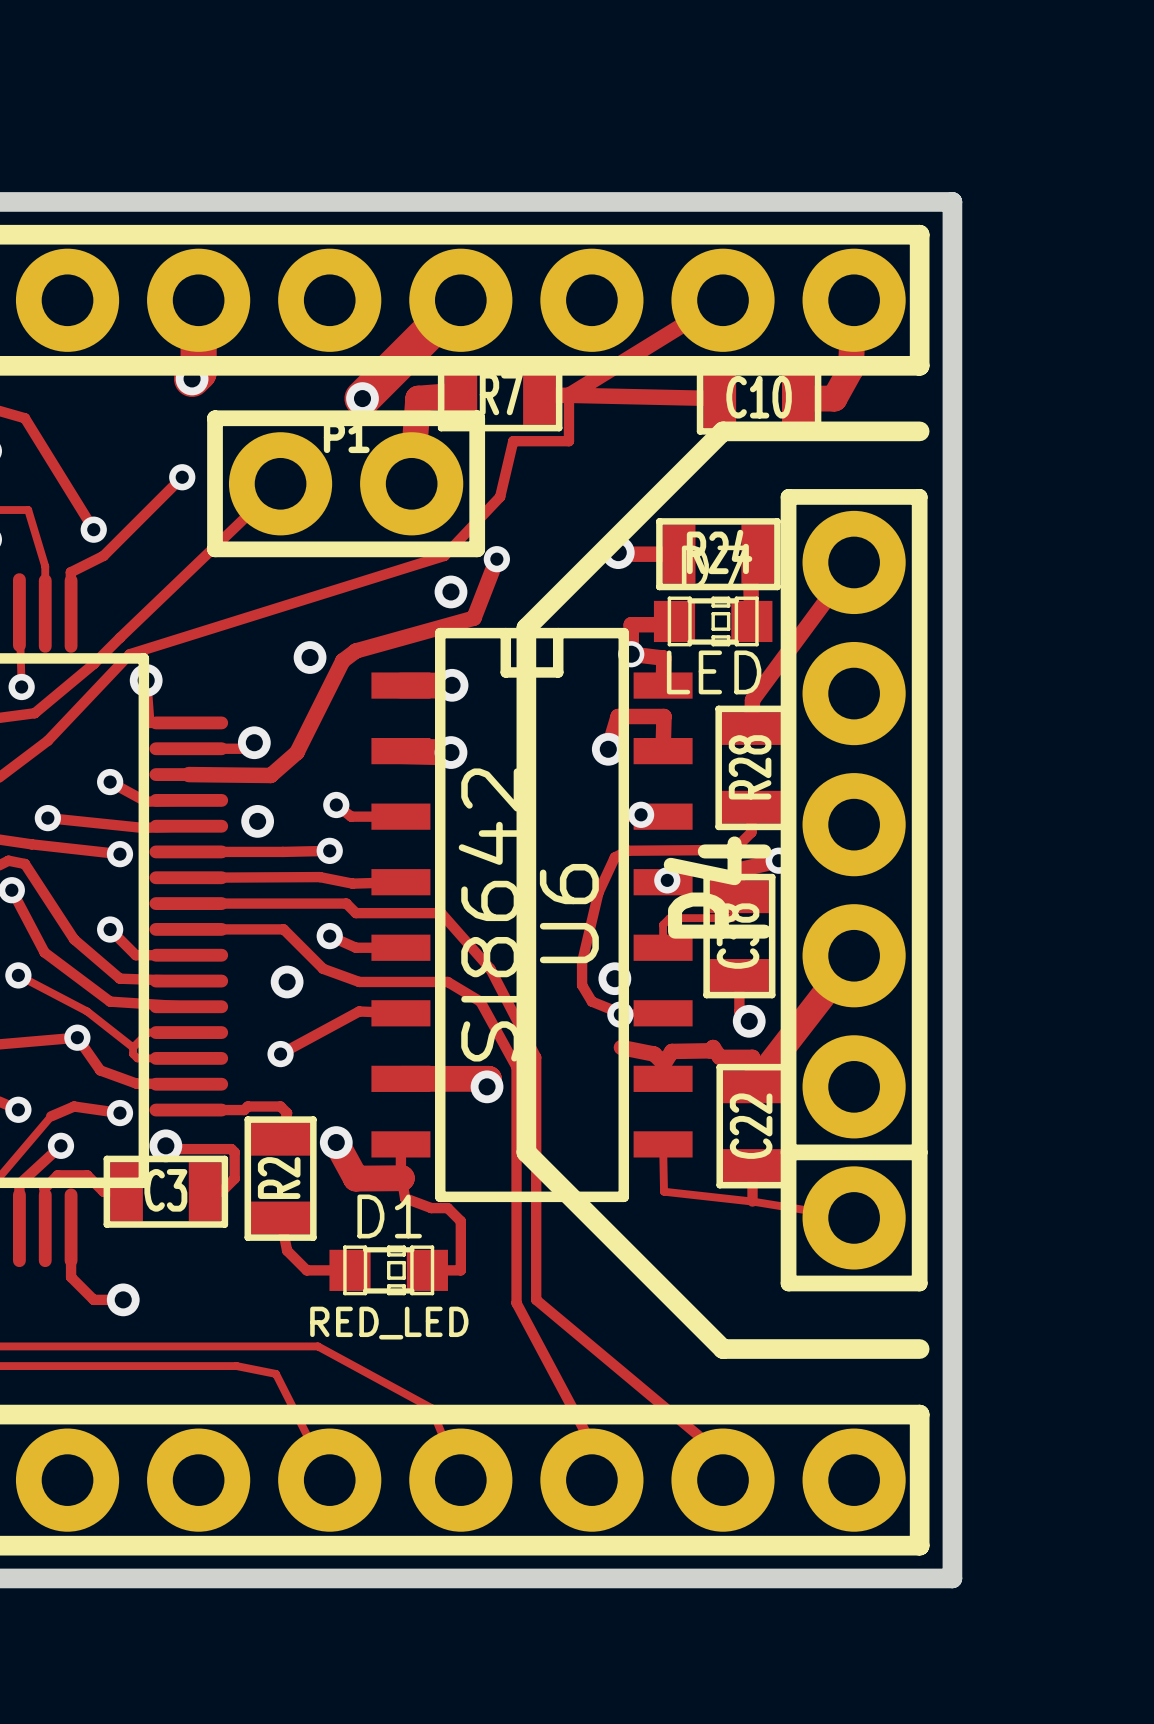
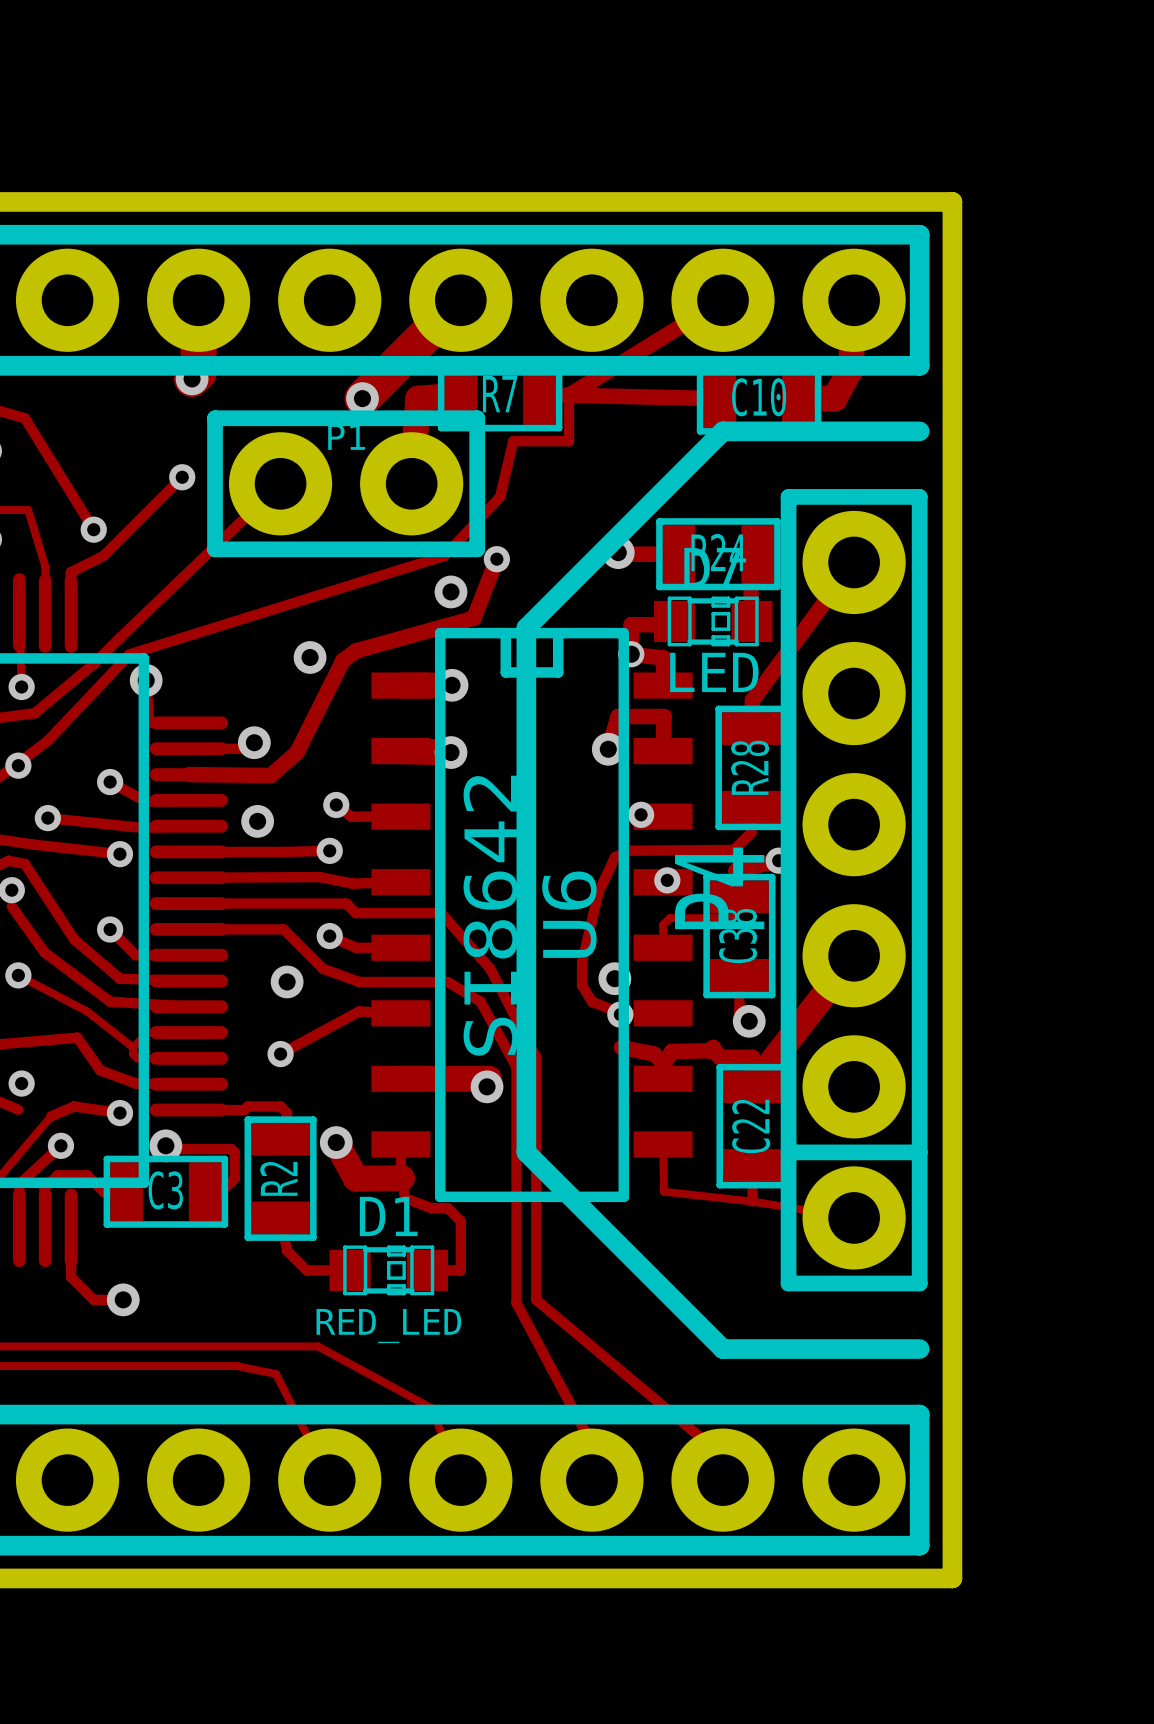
via: none -> (18, 765)
track: (11, 890) (44, 952) -> (11, 906) (44, 952)
via: (77, 1037) -> none
via position: (18, 1109) -> (21, 1083)

